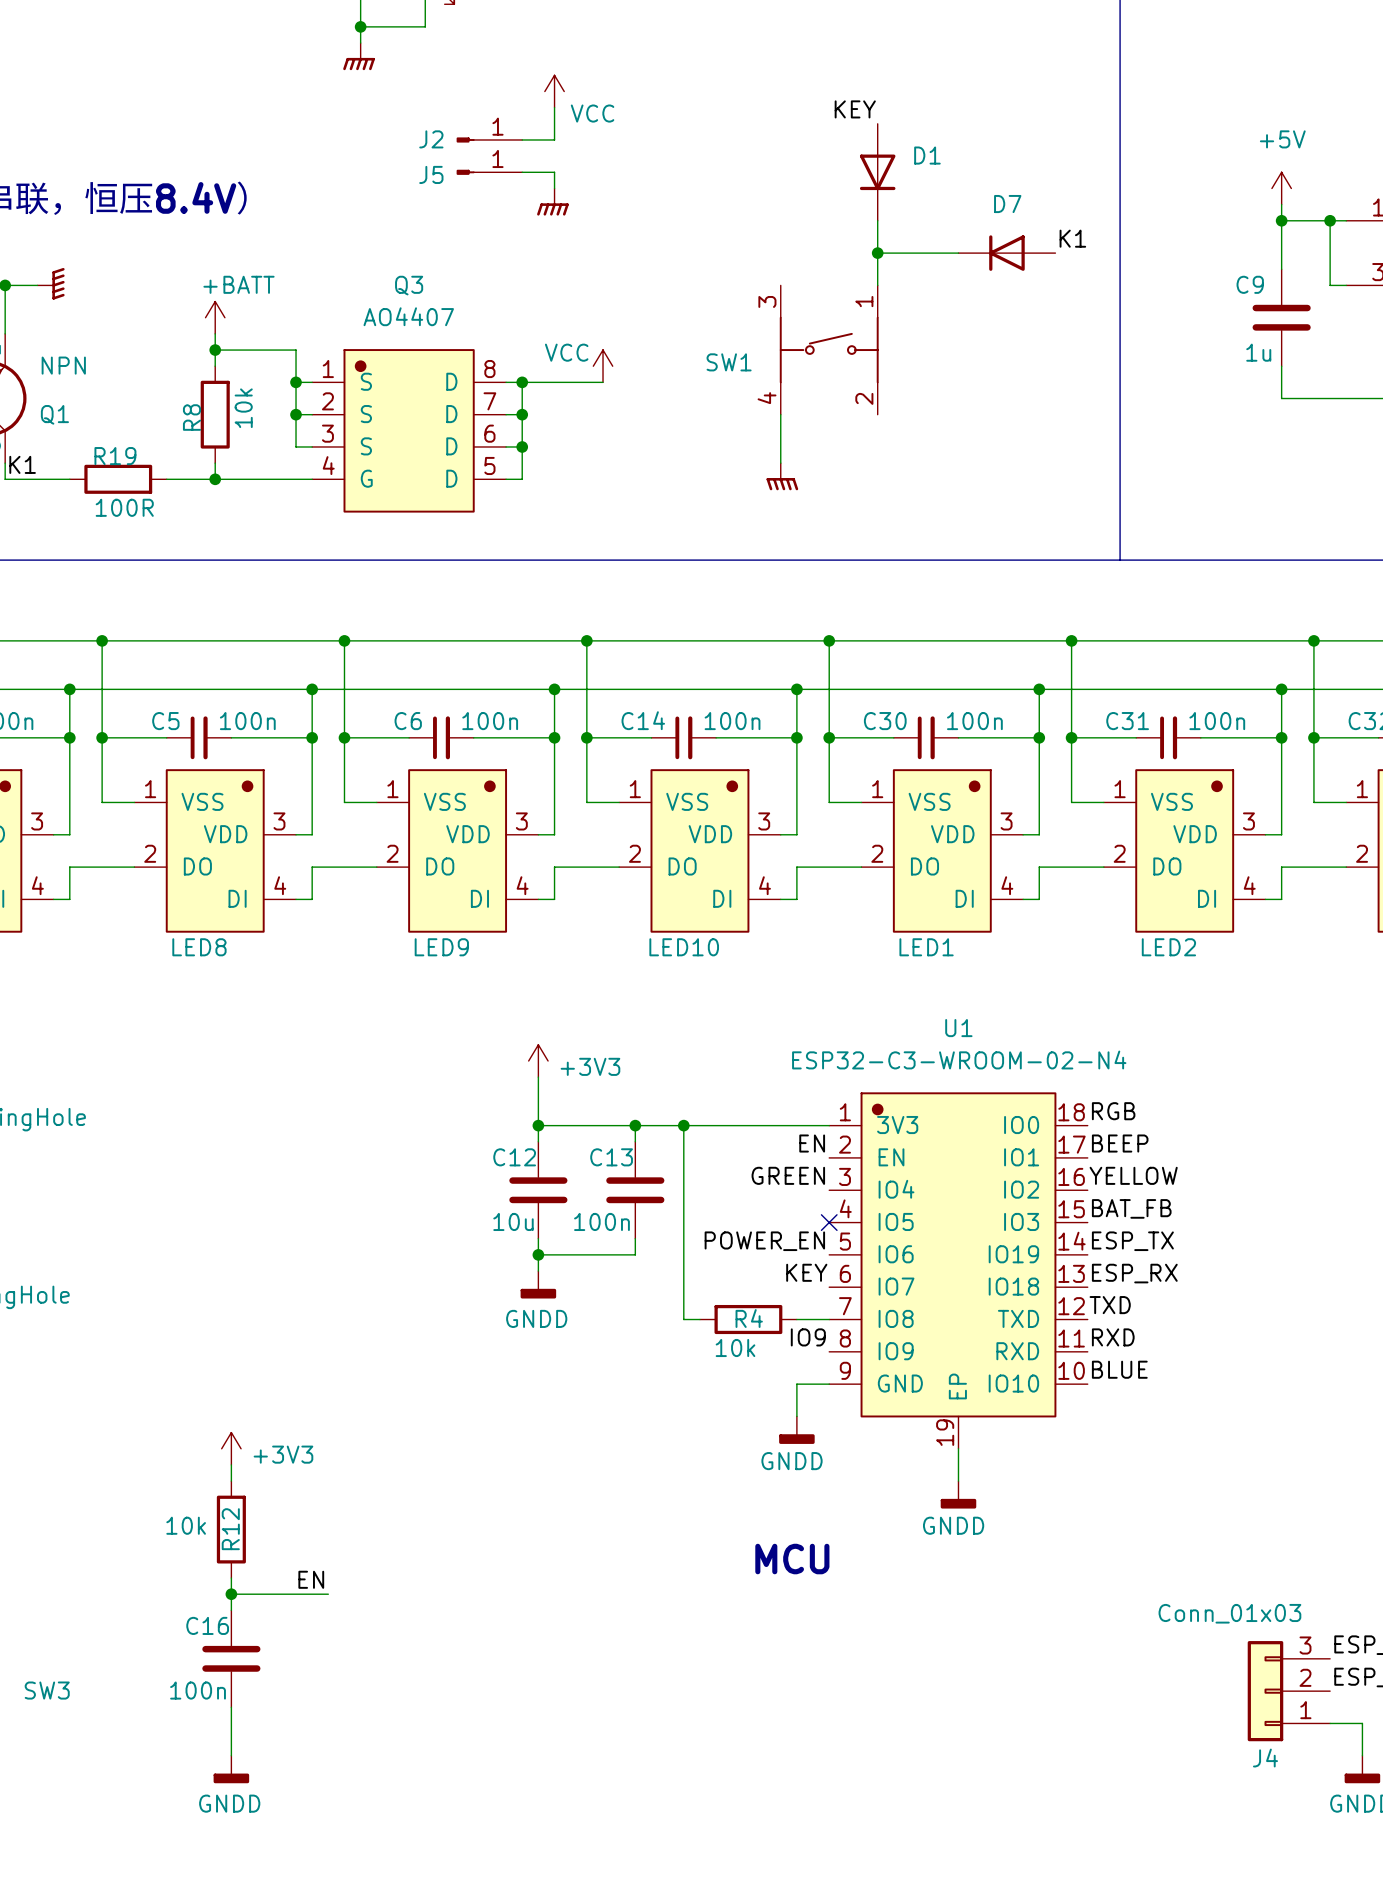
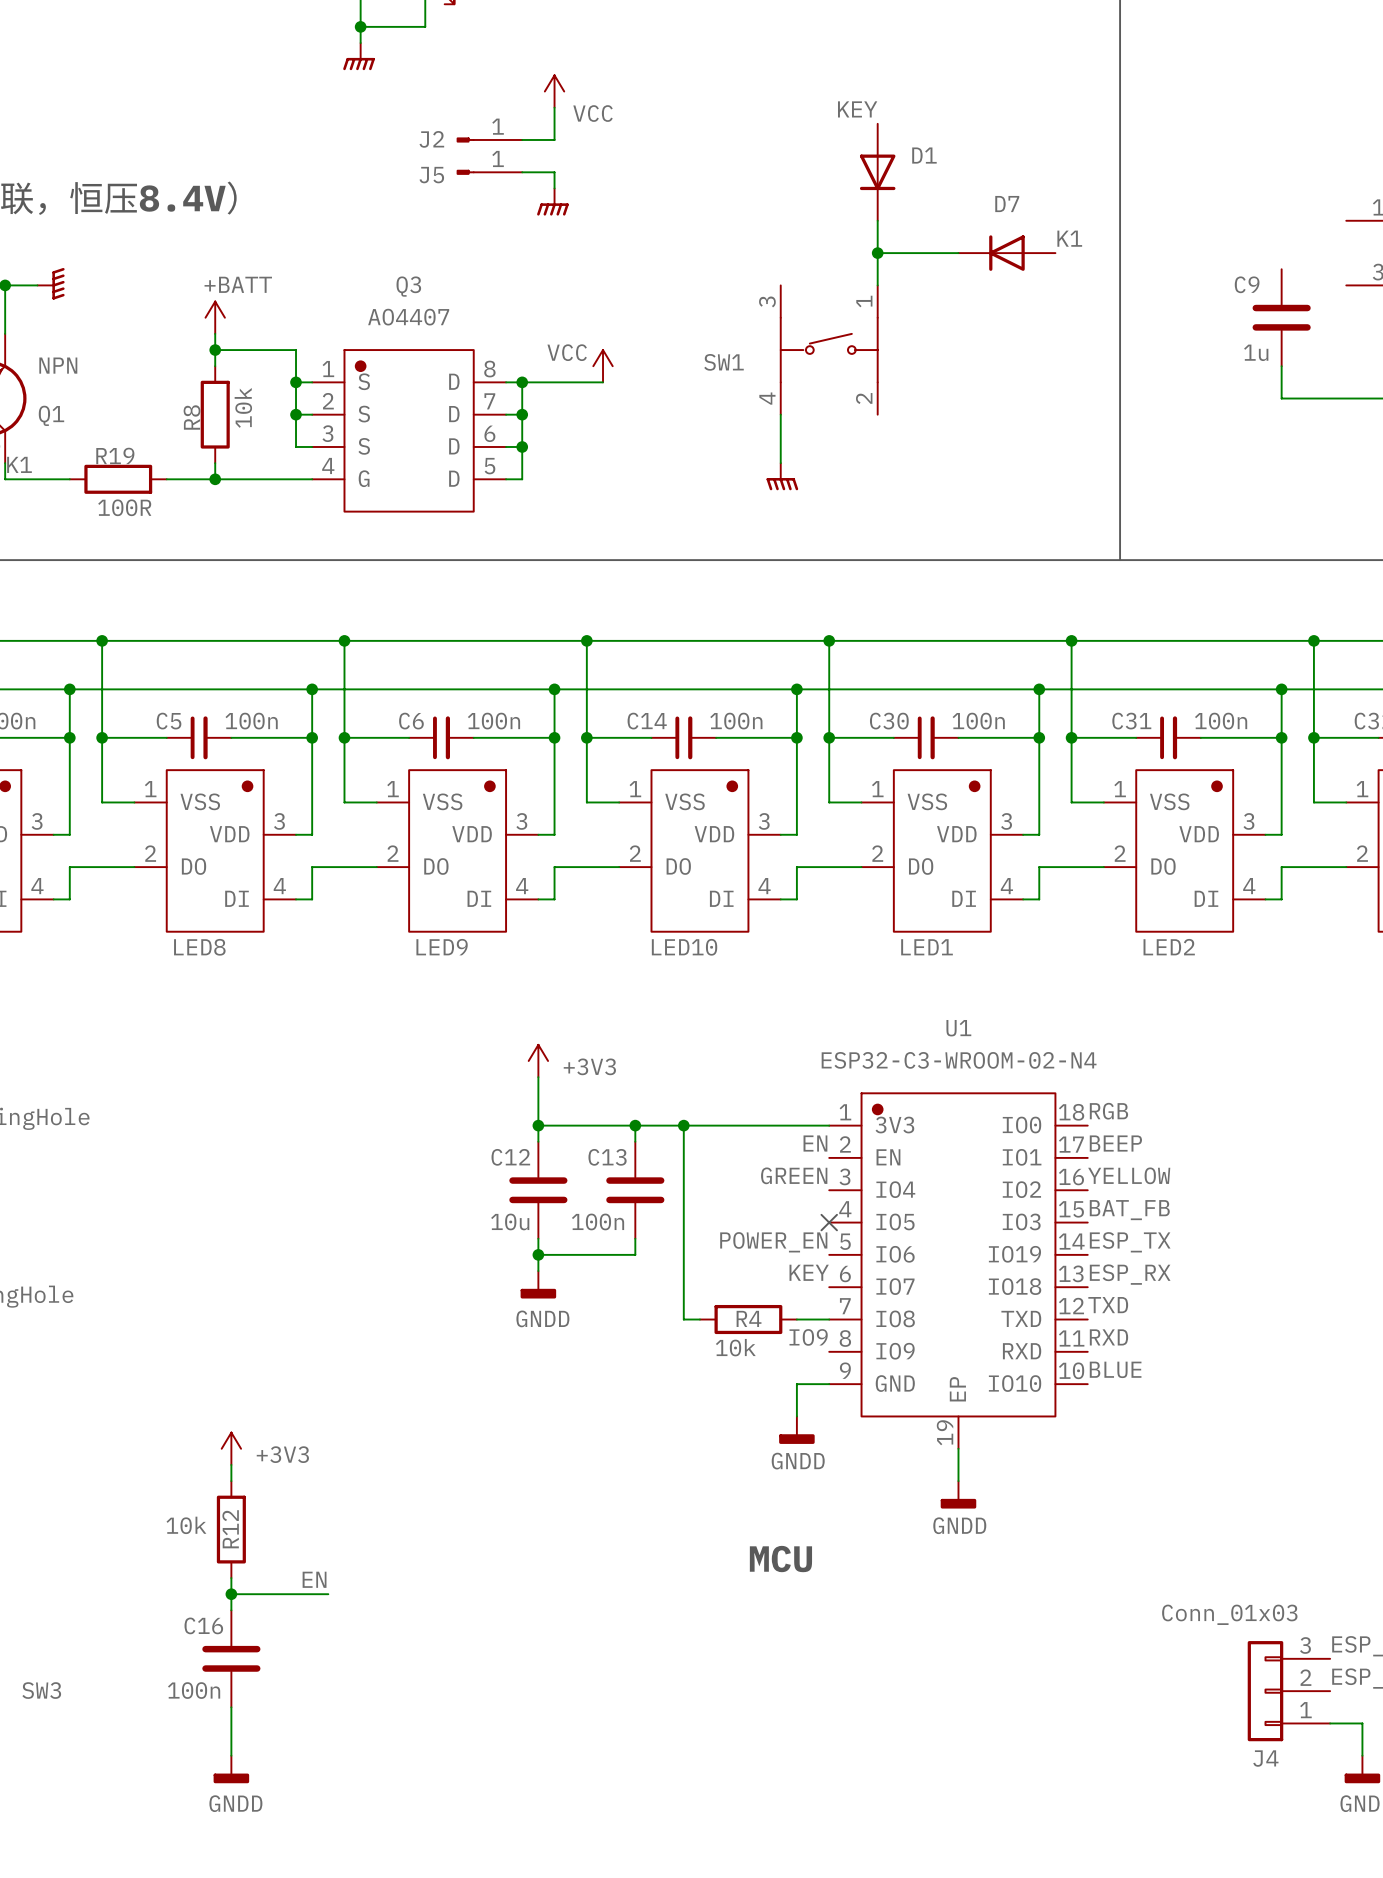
power symbol: +5V (1281, 188) -> none
wire: (1281, 204) (1281, 269) -> none
wire: (1281, 220) (1346, 220) -> none
junction: (1281, 220) -> none
wire: (1330, 220) (1330, 285) (1346, 285) -> none
junction: (1330, 220) -> none

